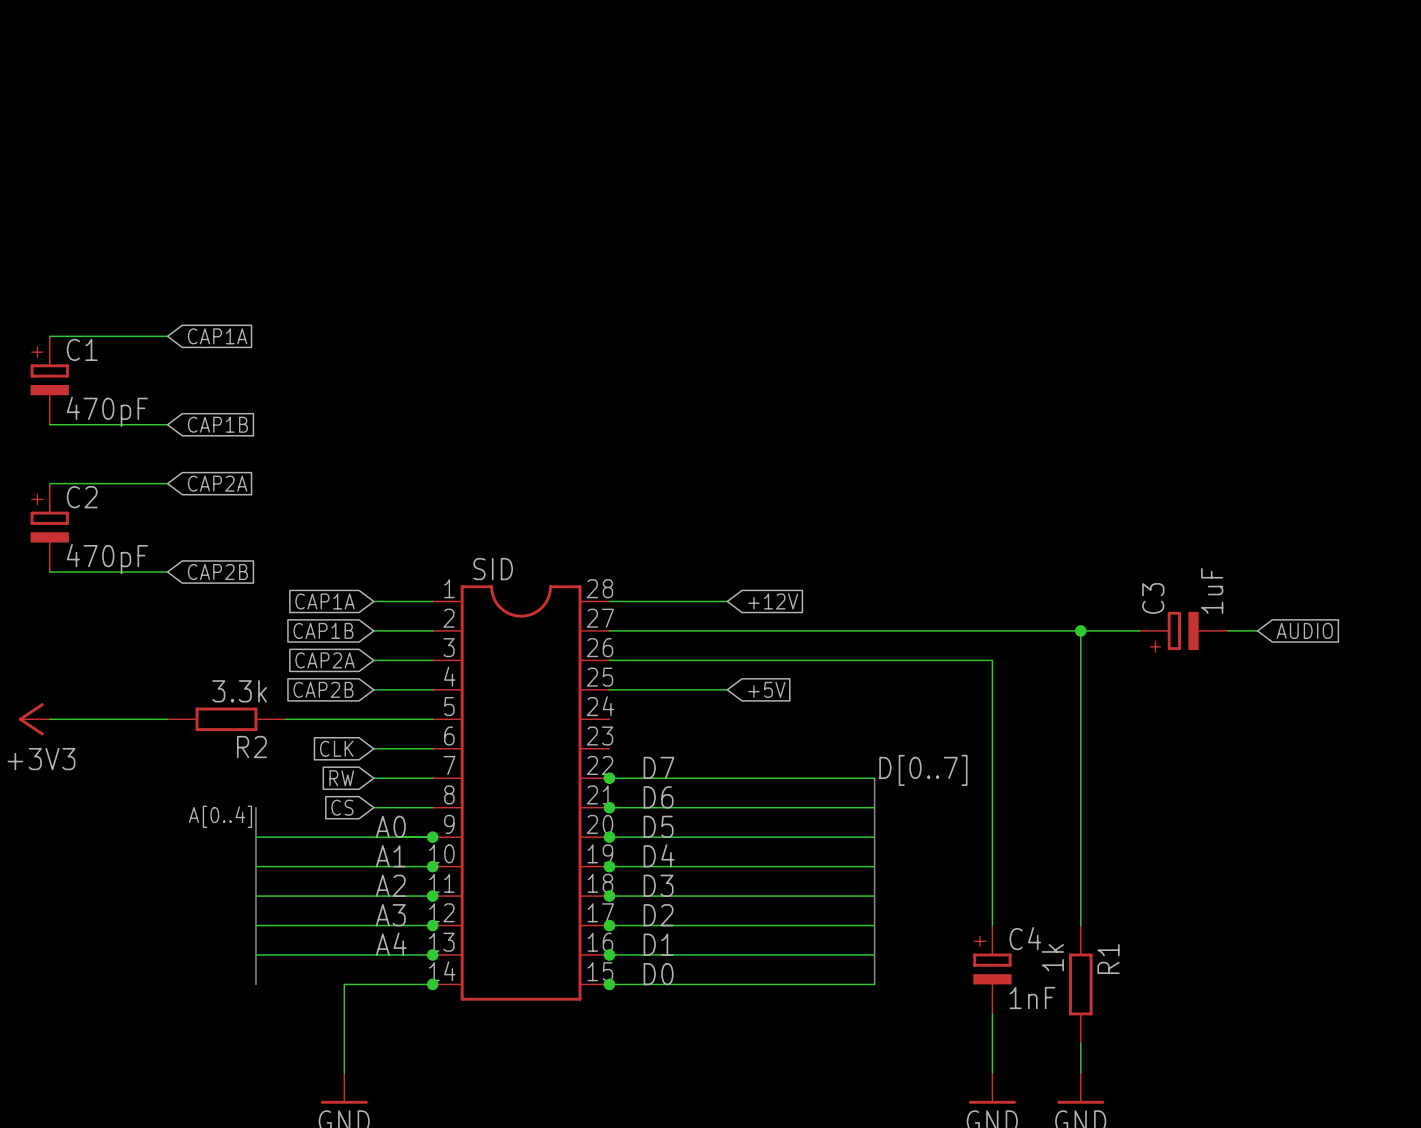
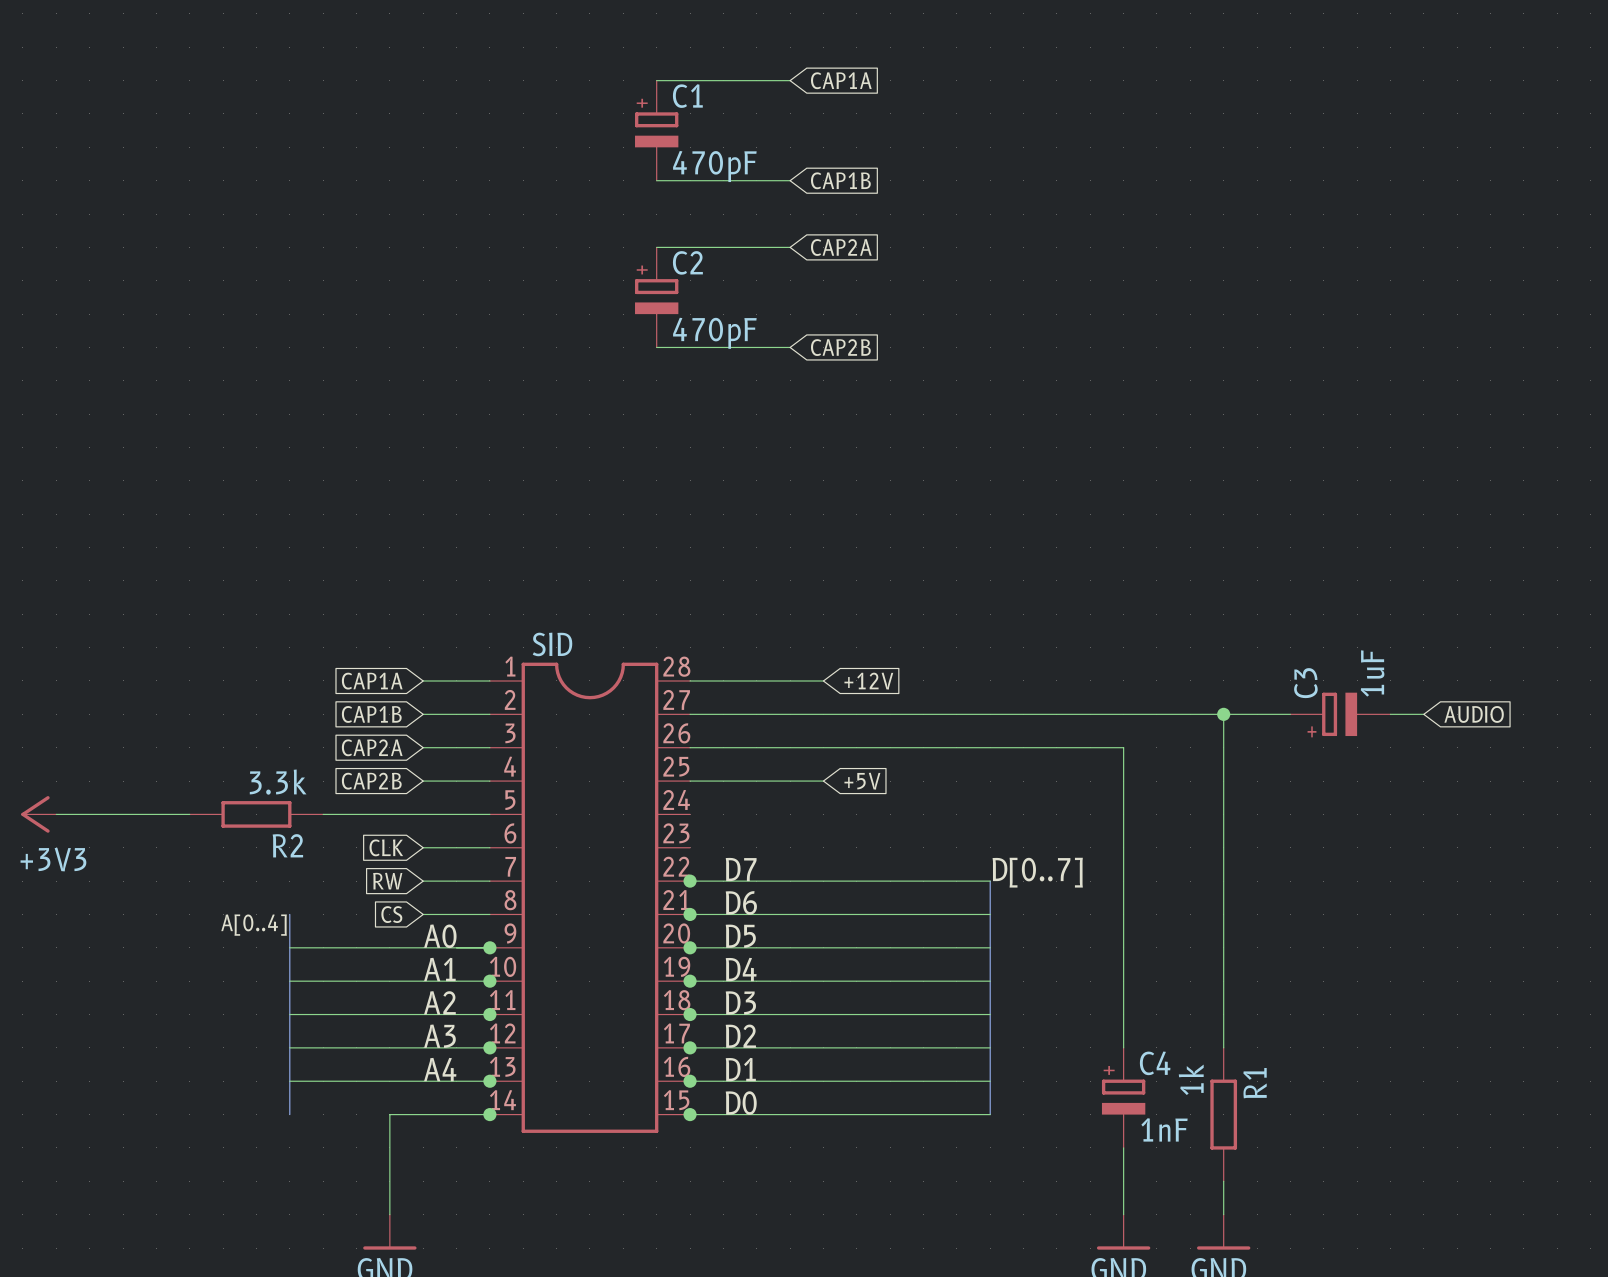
wire: none -> (656, 80) (790, 80)
global label: none -> CAP1A (841, 80)
wire: none -> (656, 180) (790, 180)
global label: none -> CAP1B (840, 180)
wire: none -> (656, 247) (790, 247)
global label: none -> CAP2A (841, 247)
wire: none -> (656, 347) (790, 347)
global label: none -> CAP2B (840, 347)
wire: (49, 336) (167, 336) -> none
global label: CAP1A (217, 336) -> none
C1 position: (49, 380) -> (656, 130)
wire: (49, 424) (167, 424) -> none
global label: CAP1B (217, 424) -> none
wire: (49, 483) (167, 483) -> none
global label: CAP2A (217, 483) -> none
C2 position: (49, 527) -> (656, 297)
wire: (49, 572) (167, 572) -> none
global label: CAP2B (217, 572) -> none

